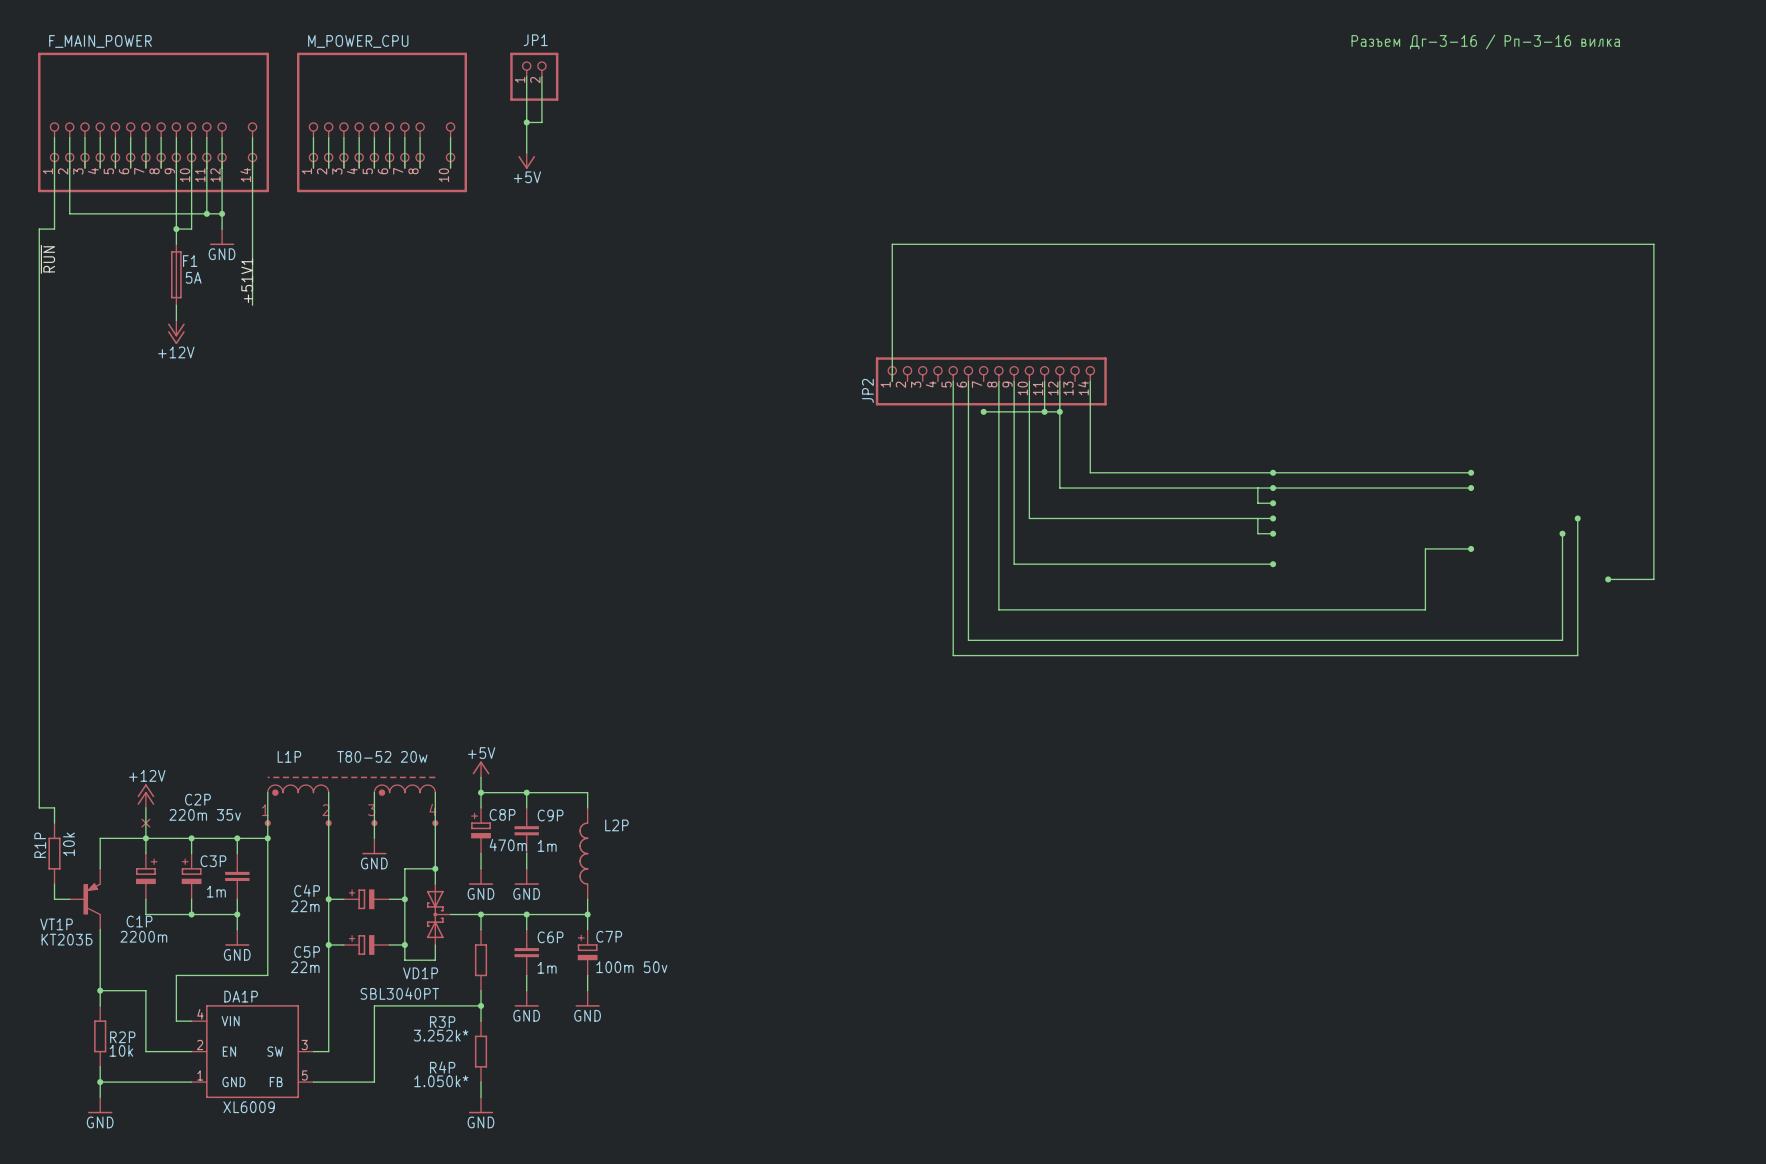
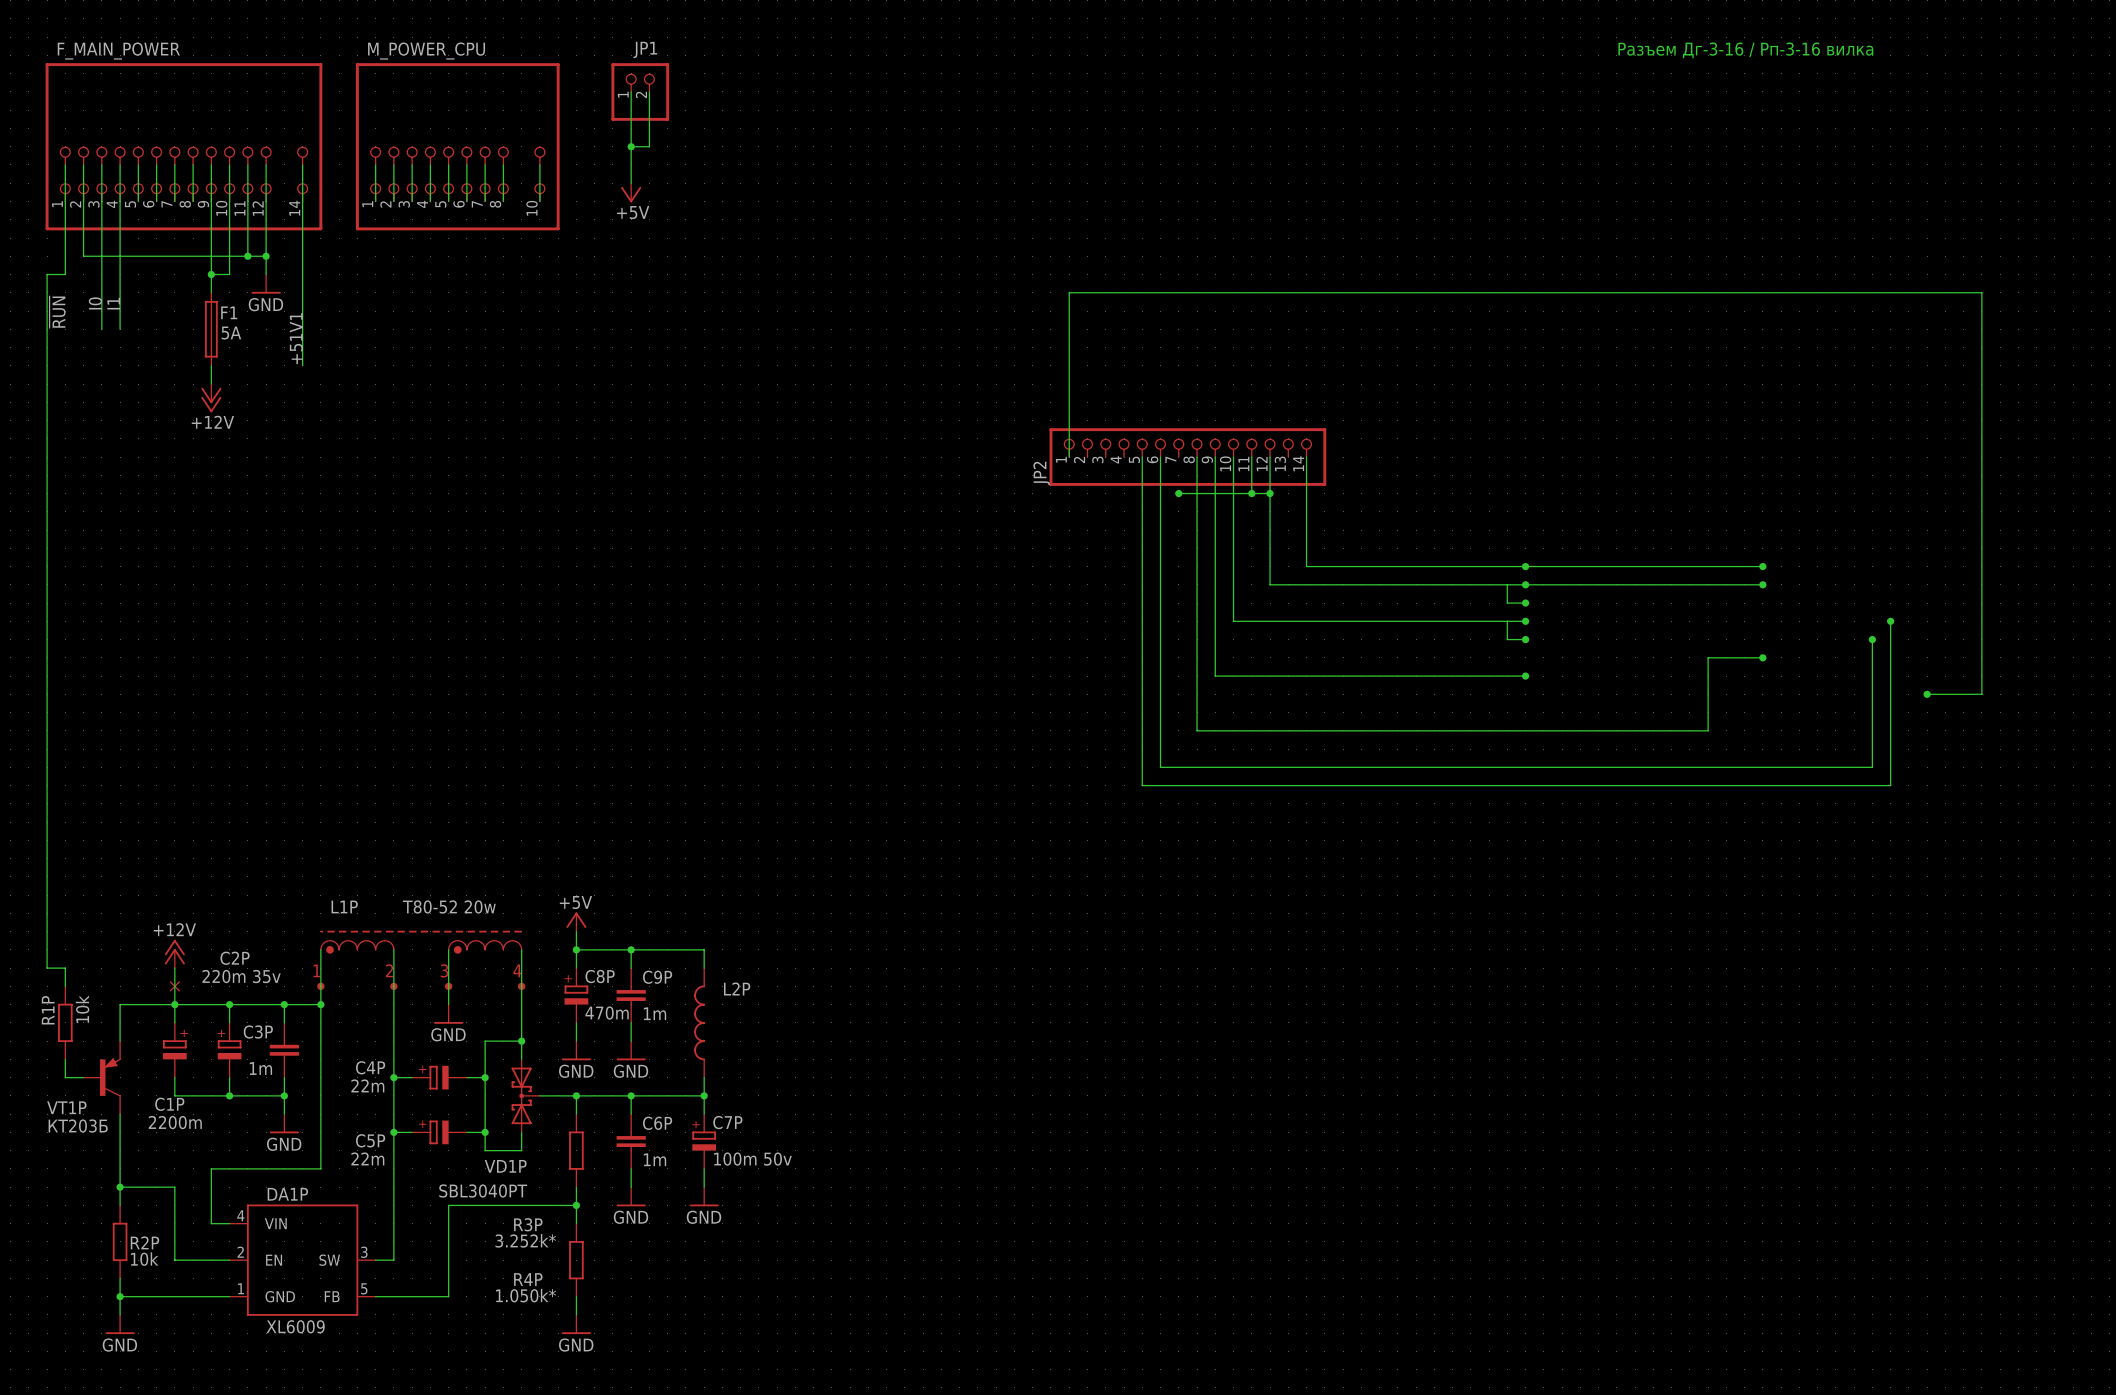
wire: none -> (101, 201) (101, 329)
wire: none -> (120, 201) (120, 329)
label: none -> I0 (95, 303)
label: none -> I1 (113, 303)

